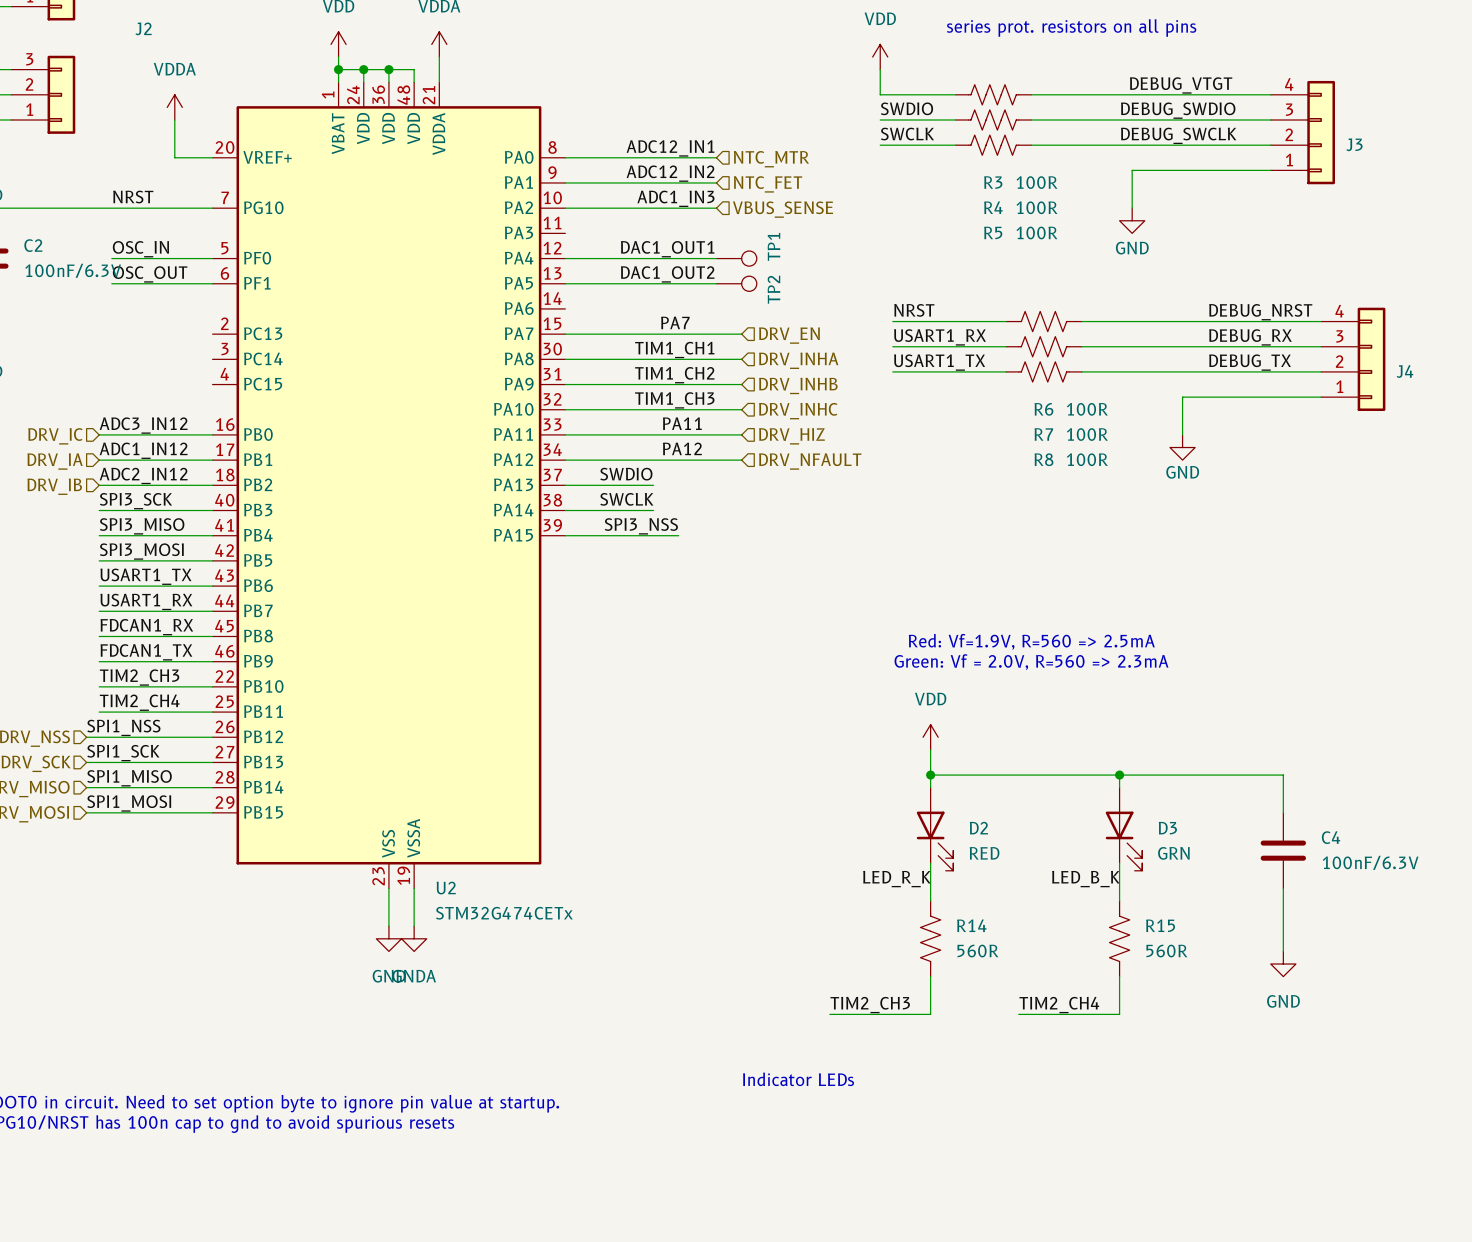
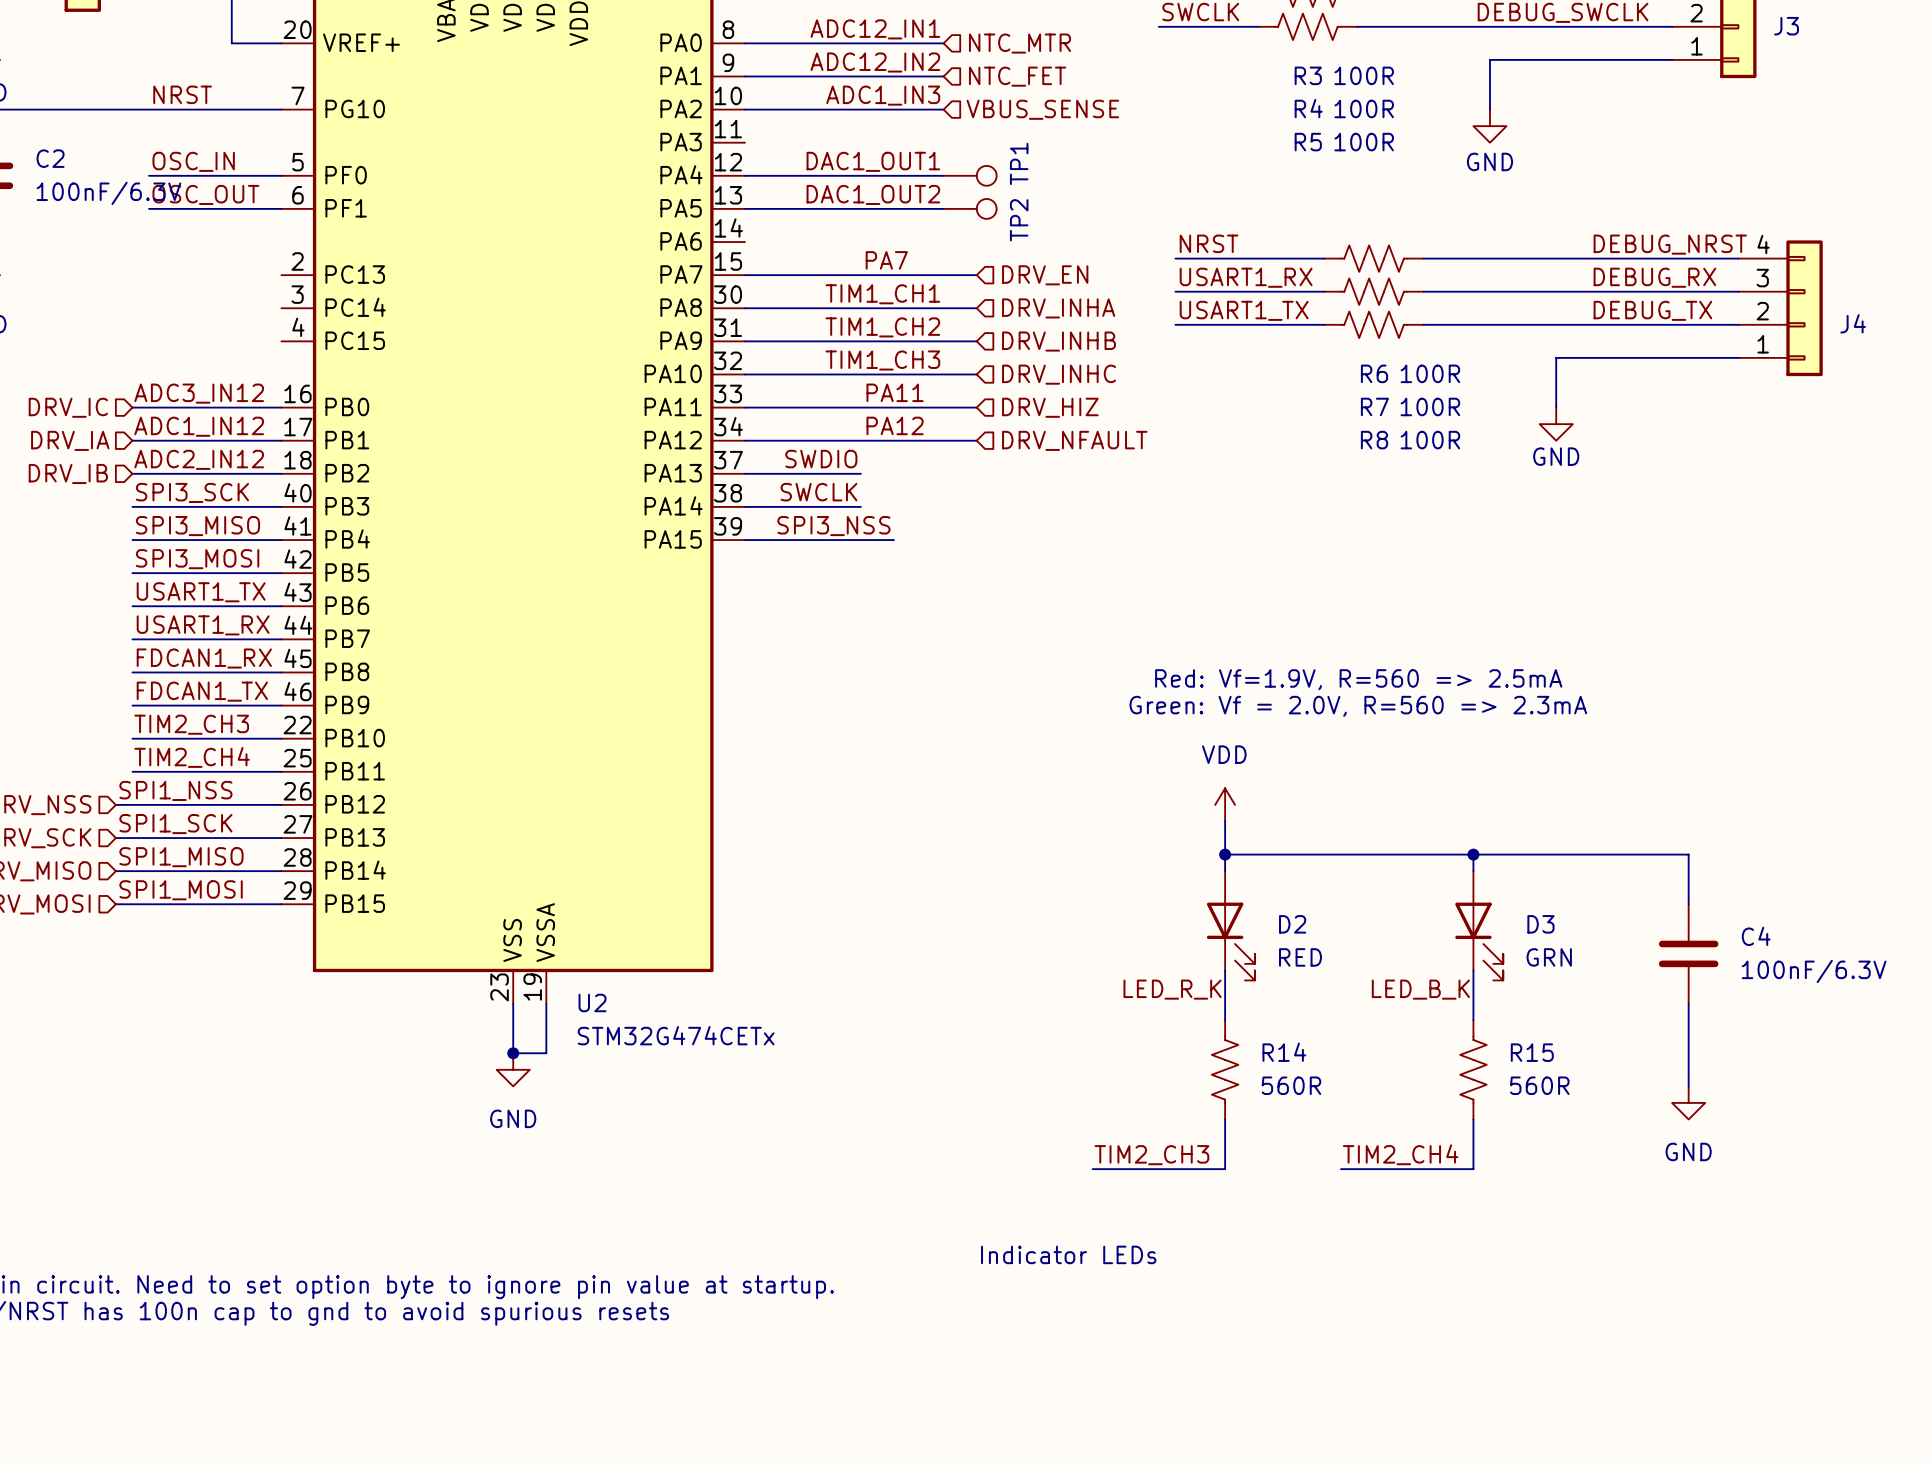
wire: none -> (513, 1053) (546, 1053)
junction: none -> (513, 1053)
power symbol: GNDA (414, 938) -> none

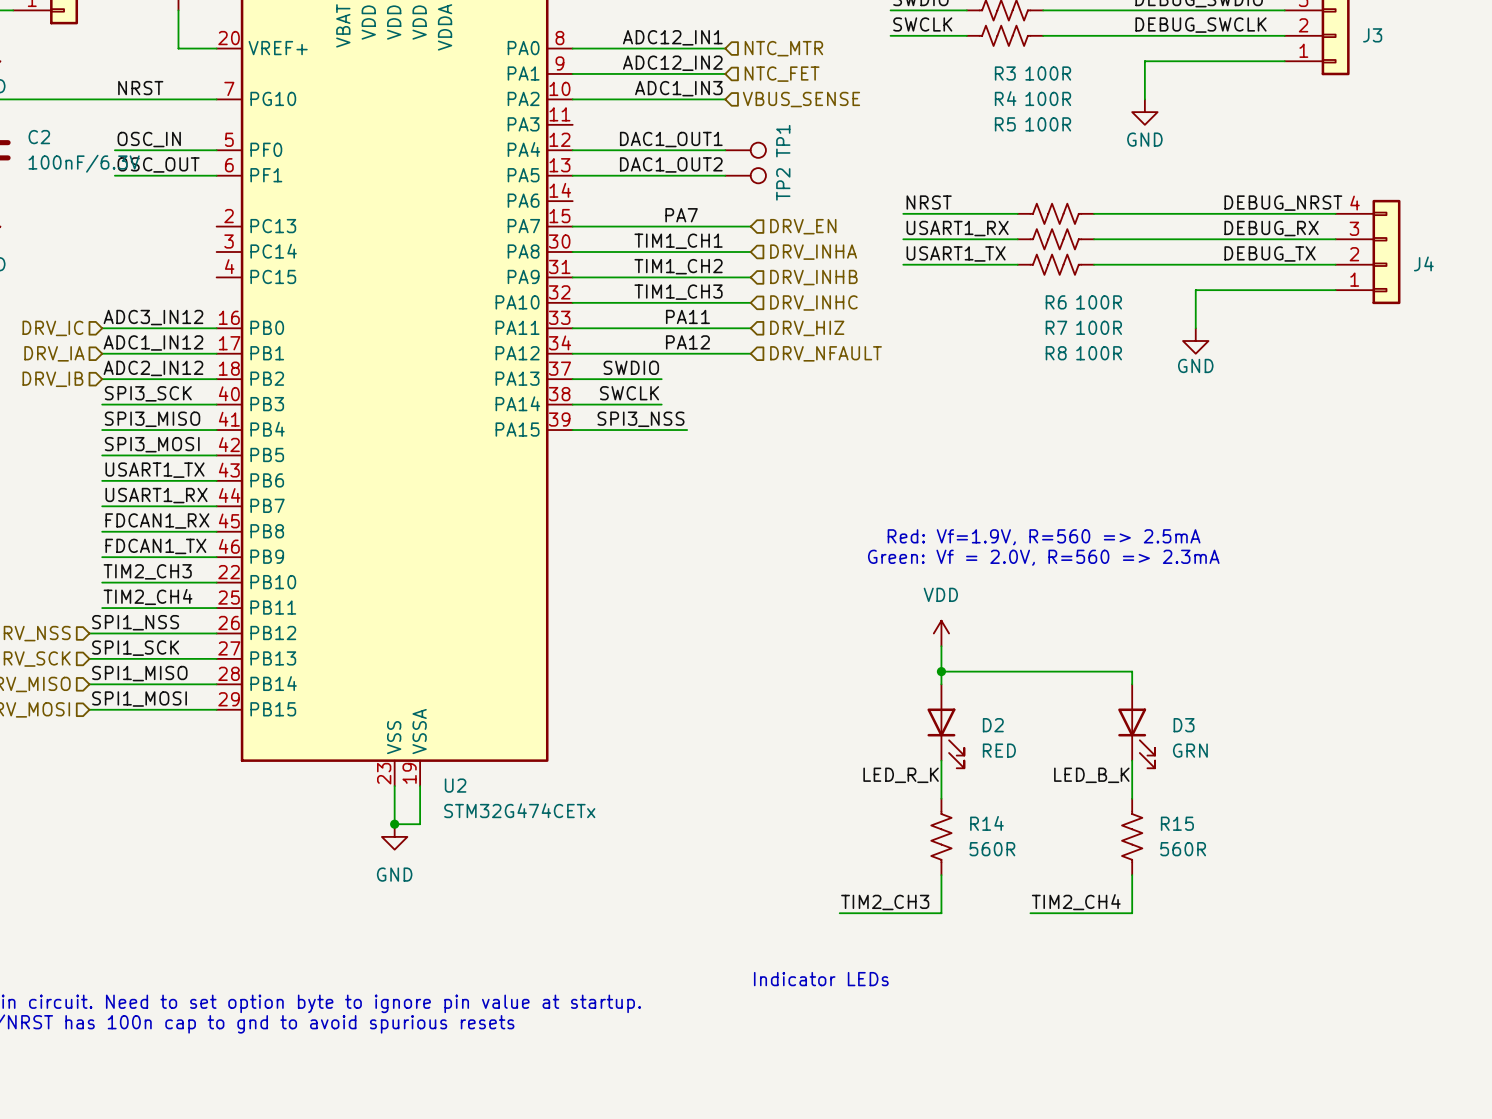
wire: (1473, 854) (1688, 854) (1688, 904) -> none
junction: (1473, 854) -> none
C4: 100nF/6.3V (1688, 953) -> none
wire: (1688, 1003) (1688, 1086) -> none
power symbol: GND (1688, 1102) -> none

